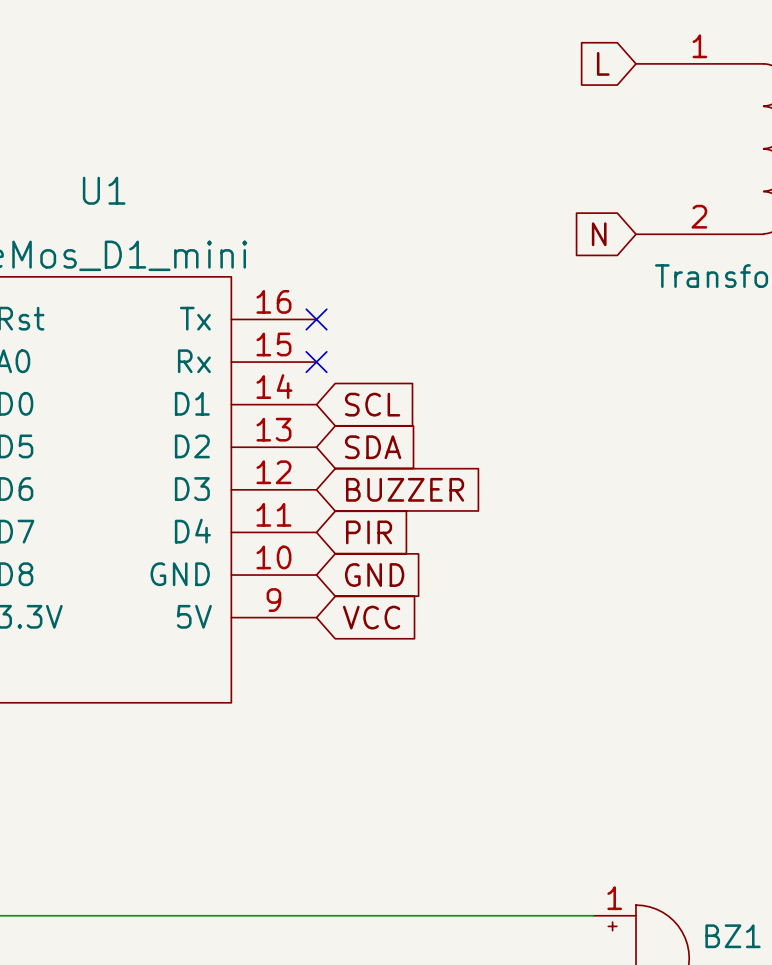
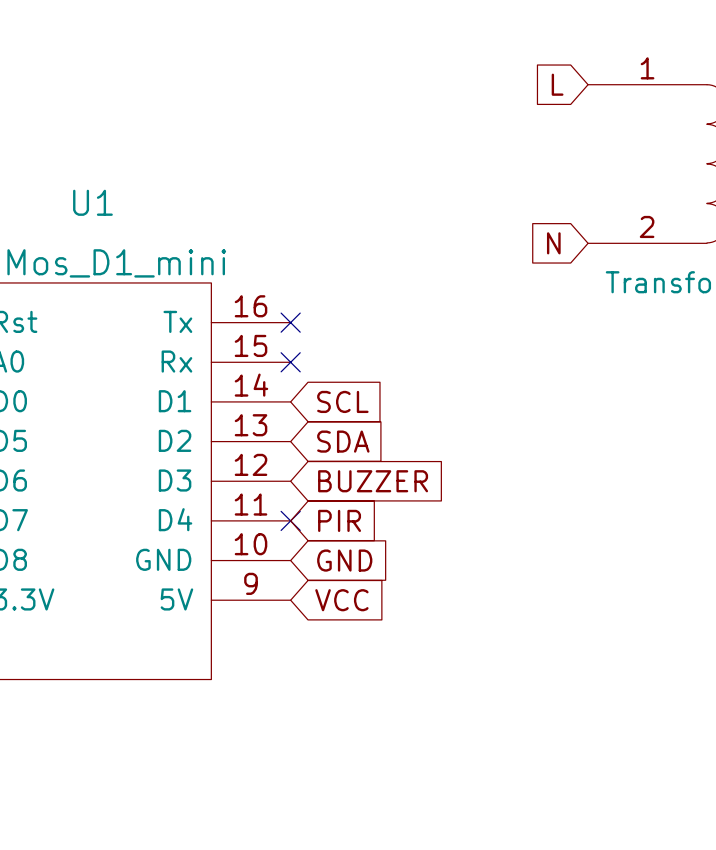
no-connect mark: none -> (290, 520)

